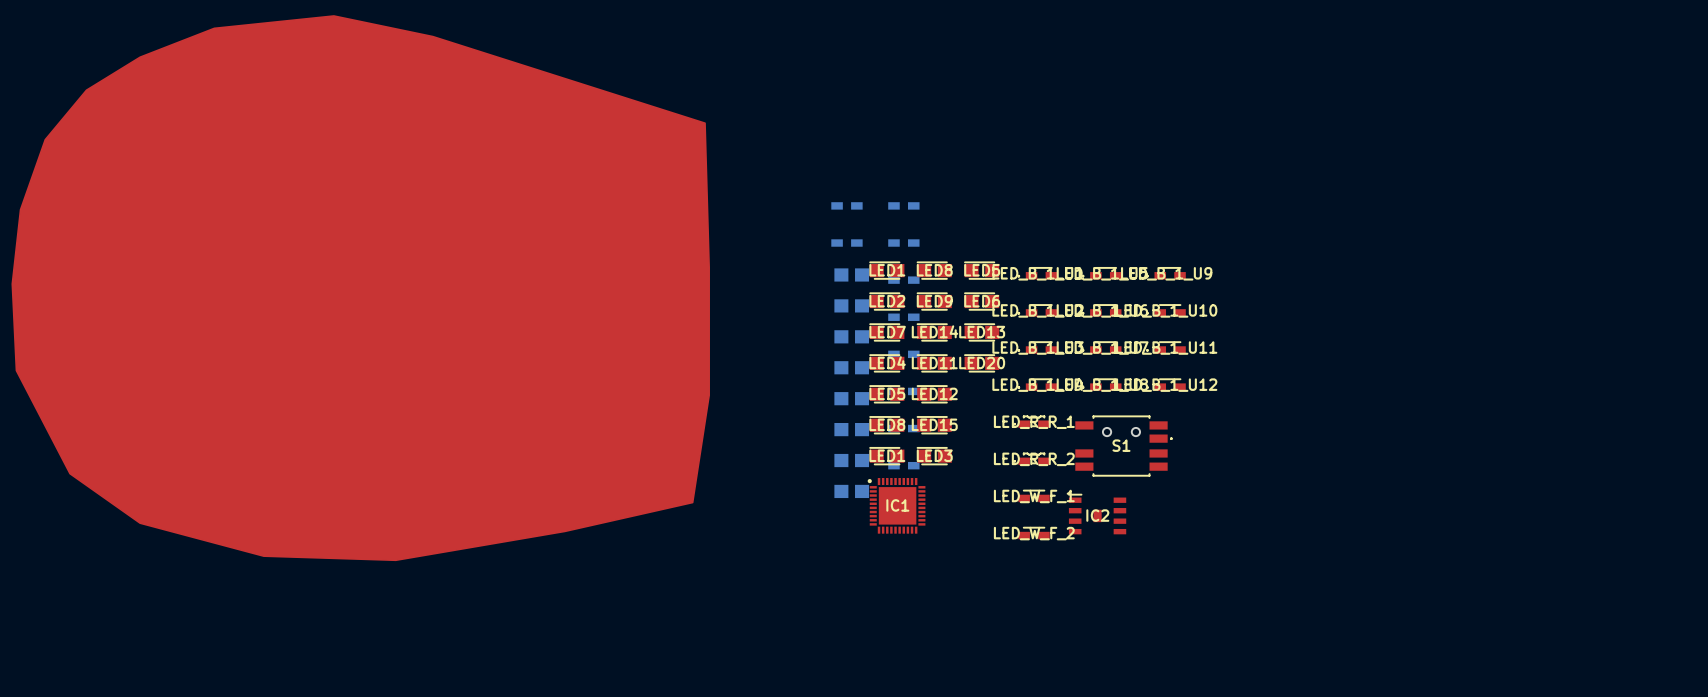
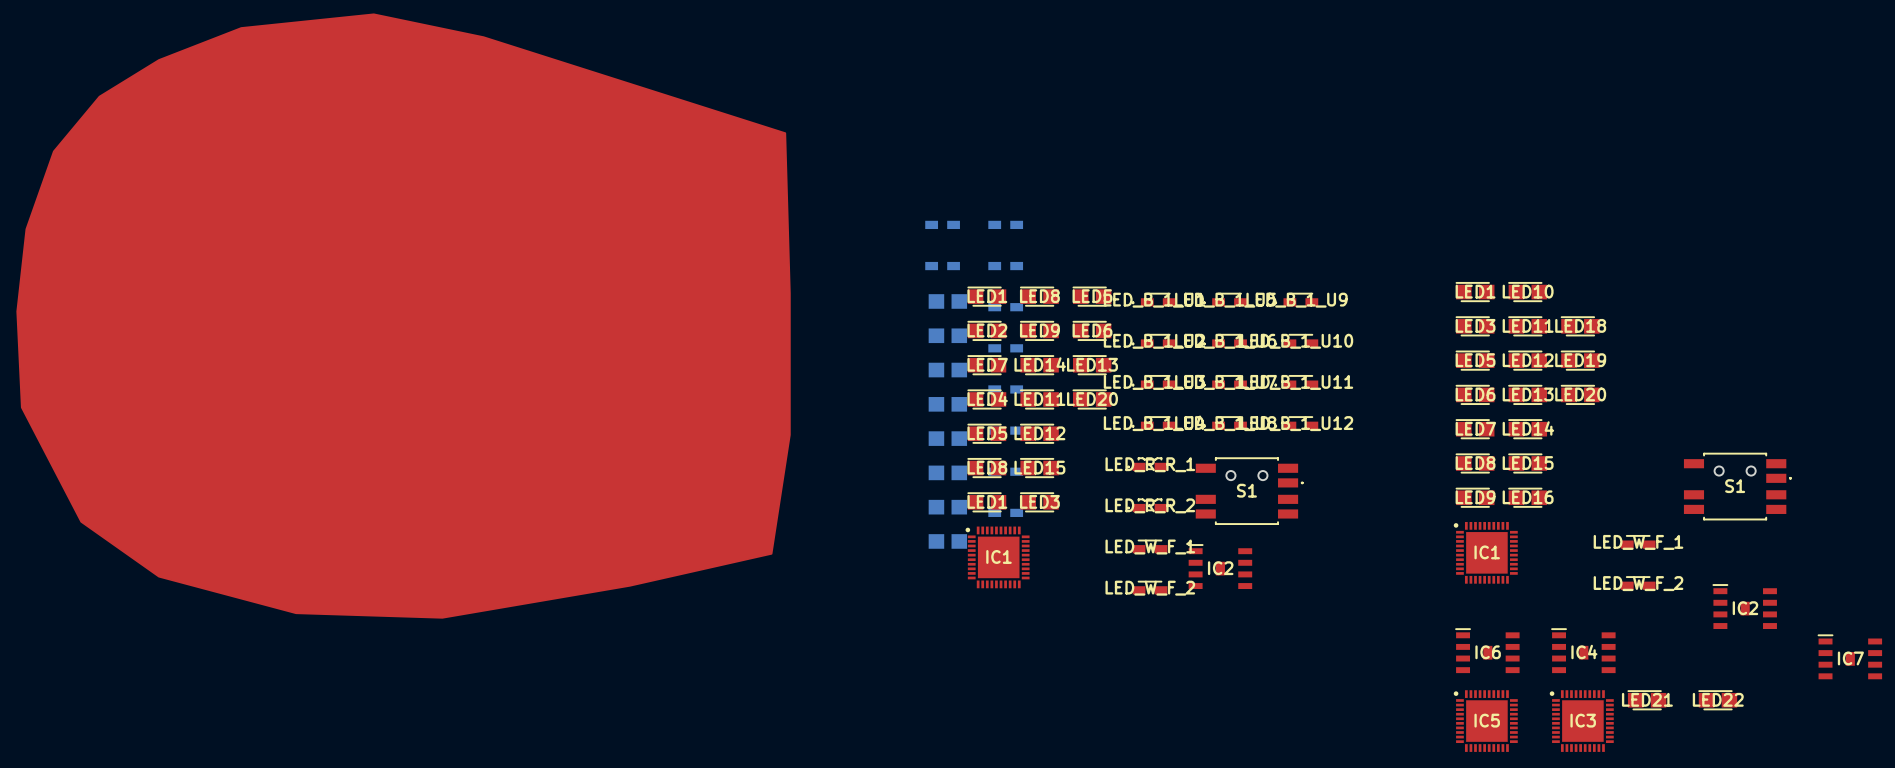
LED1: none -> (1475, 292)
LED10: none -> (1527, 292)
LED3: none -> (1475, 326)
LED11: none -> (1527, 326)
LED18: none -> (1580, 326)
LED5: none -> (1475, 360)
LED12: none -> (1527, 360)
LED19: none -> (1580, 360)
LED6: none -> (1475, 394)
LED13: none -> (1527, 394)
LED20: none -> (1580, 394)
LED7: none -> (1475, 429)
LED14: none -> (1527, 429)
LED8: none -> (1475, 463)
LED15: none -> (1527, 463)
S1: none -> (1737, 486)
LED9: none -> (1475, 497)
LED16: none -> (1527, 497)
LED_W_F_1: none -> (1638, 542)
IC1: none -> (1485, 552)
LED_W_F_2: none -> (1638, 583)
IC2: none -> (1744, 606)
IC6: none -> (1487, 650)
IC4: none -> (1583, 650)
IC7: none -> (1849, 656)
LED21: none -> (1646, 700)
LED22: none -> (1717, 700)
IC5: none -> (1485, 721)
IC3: none -> (1581, 721)

